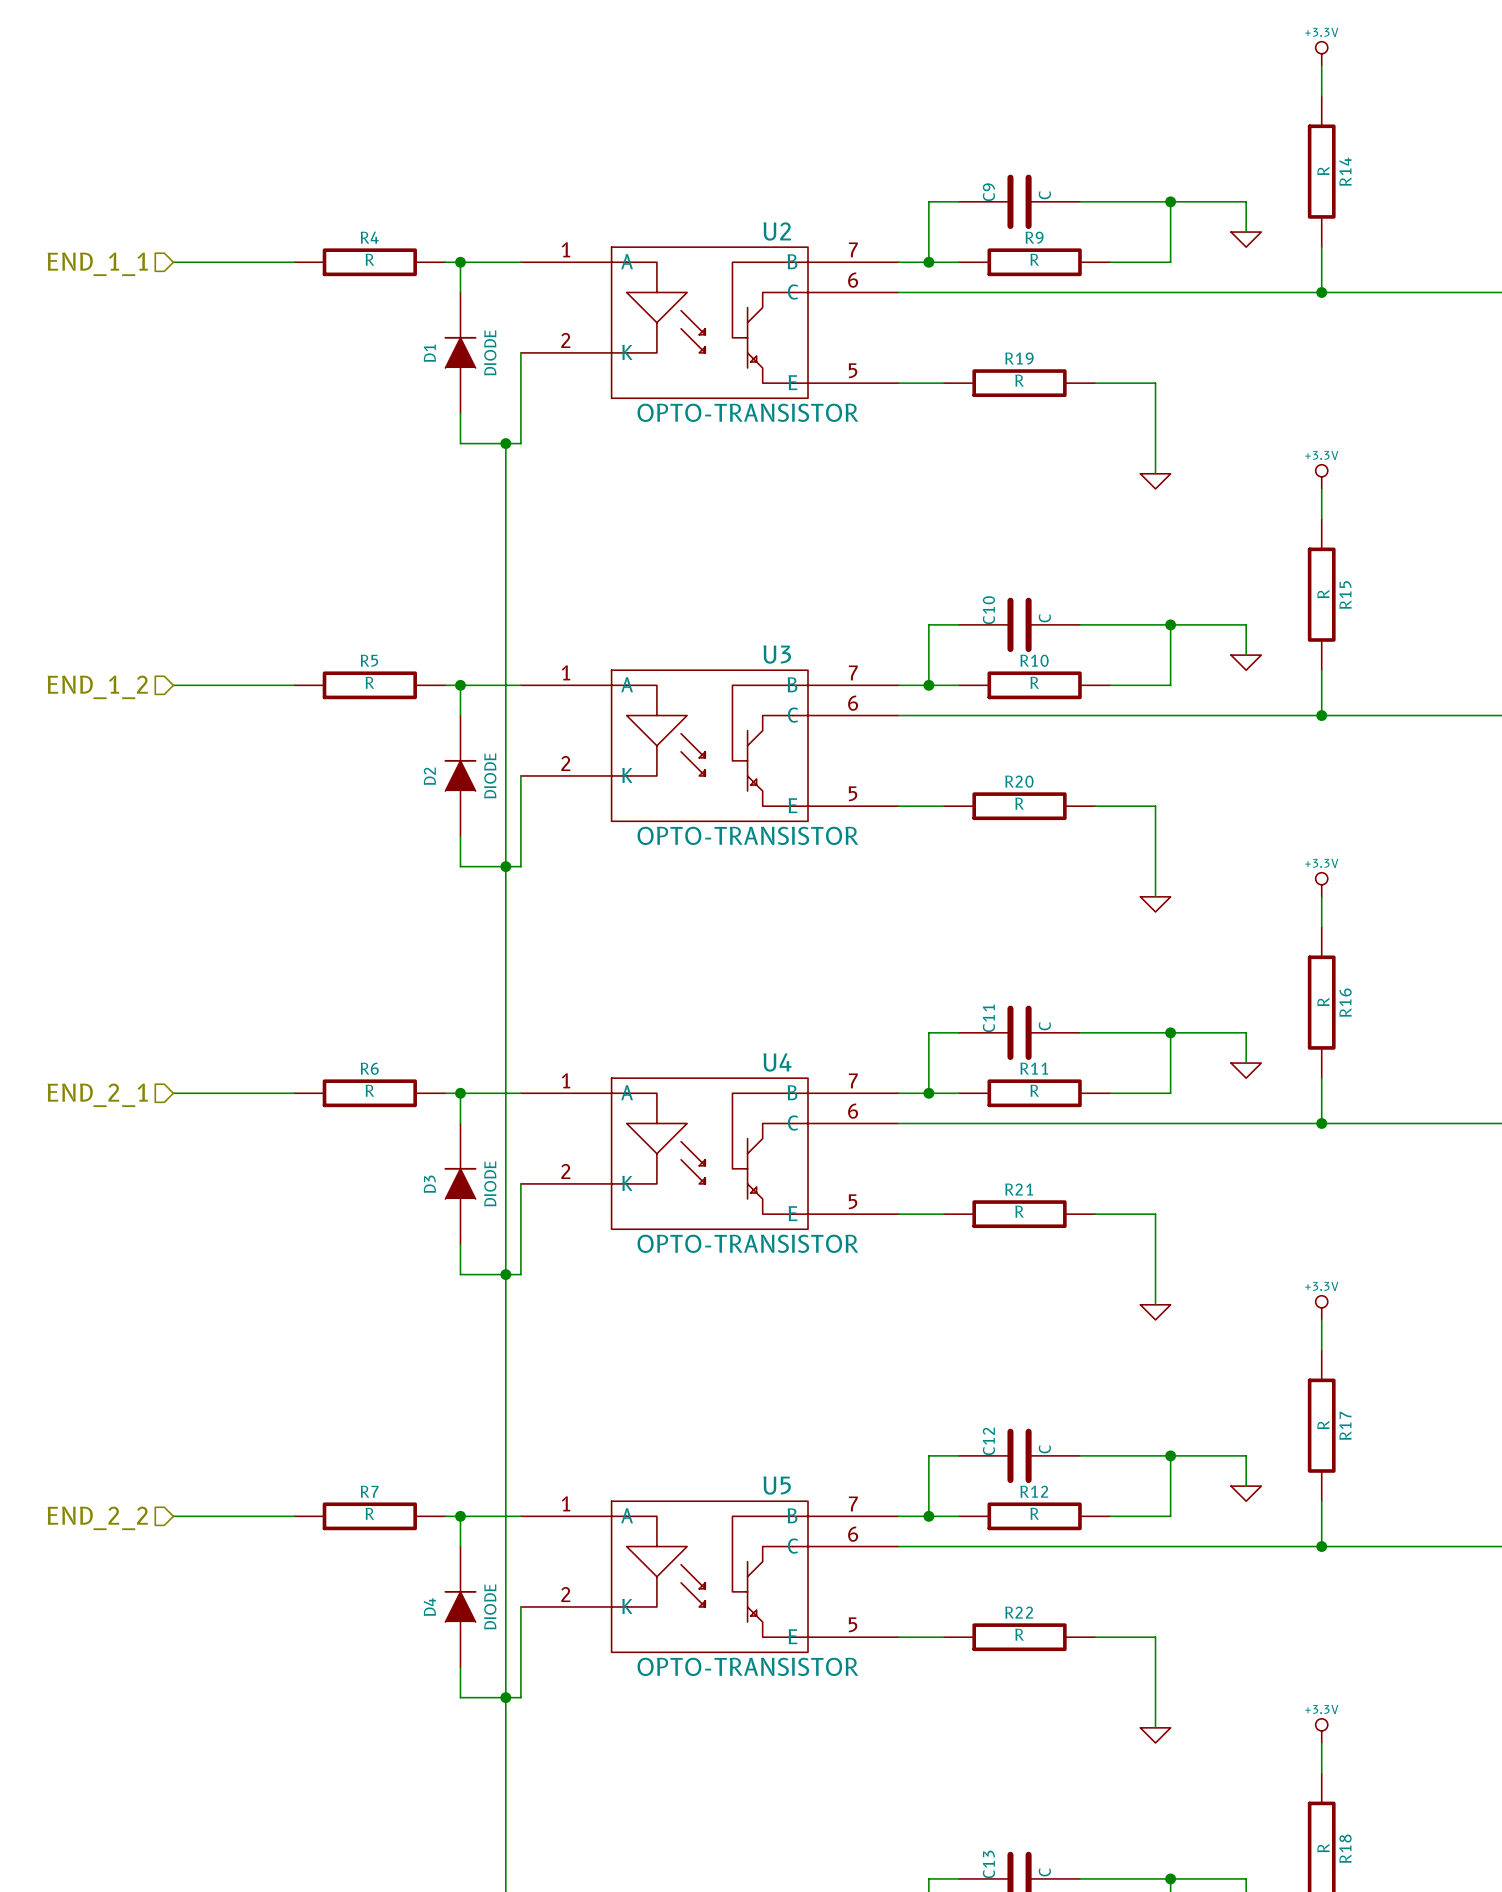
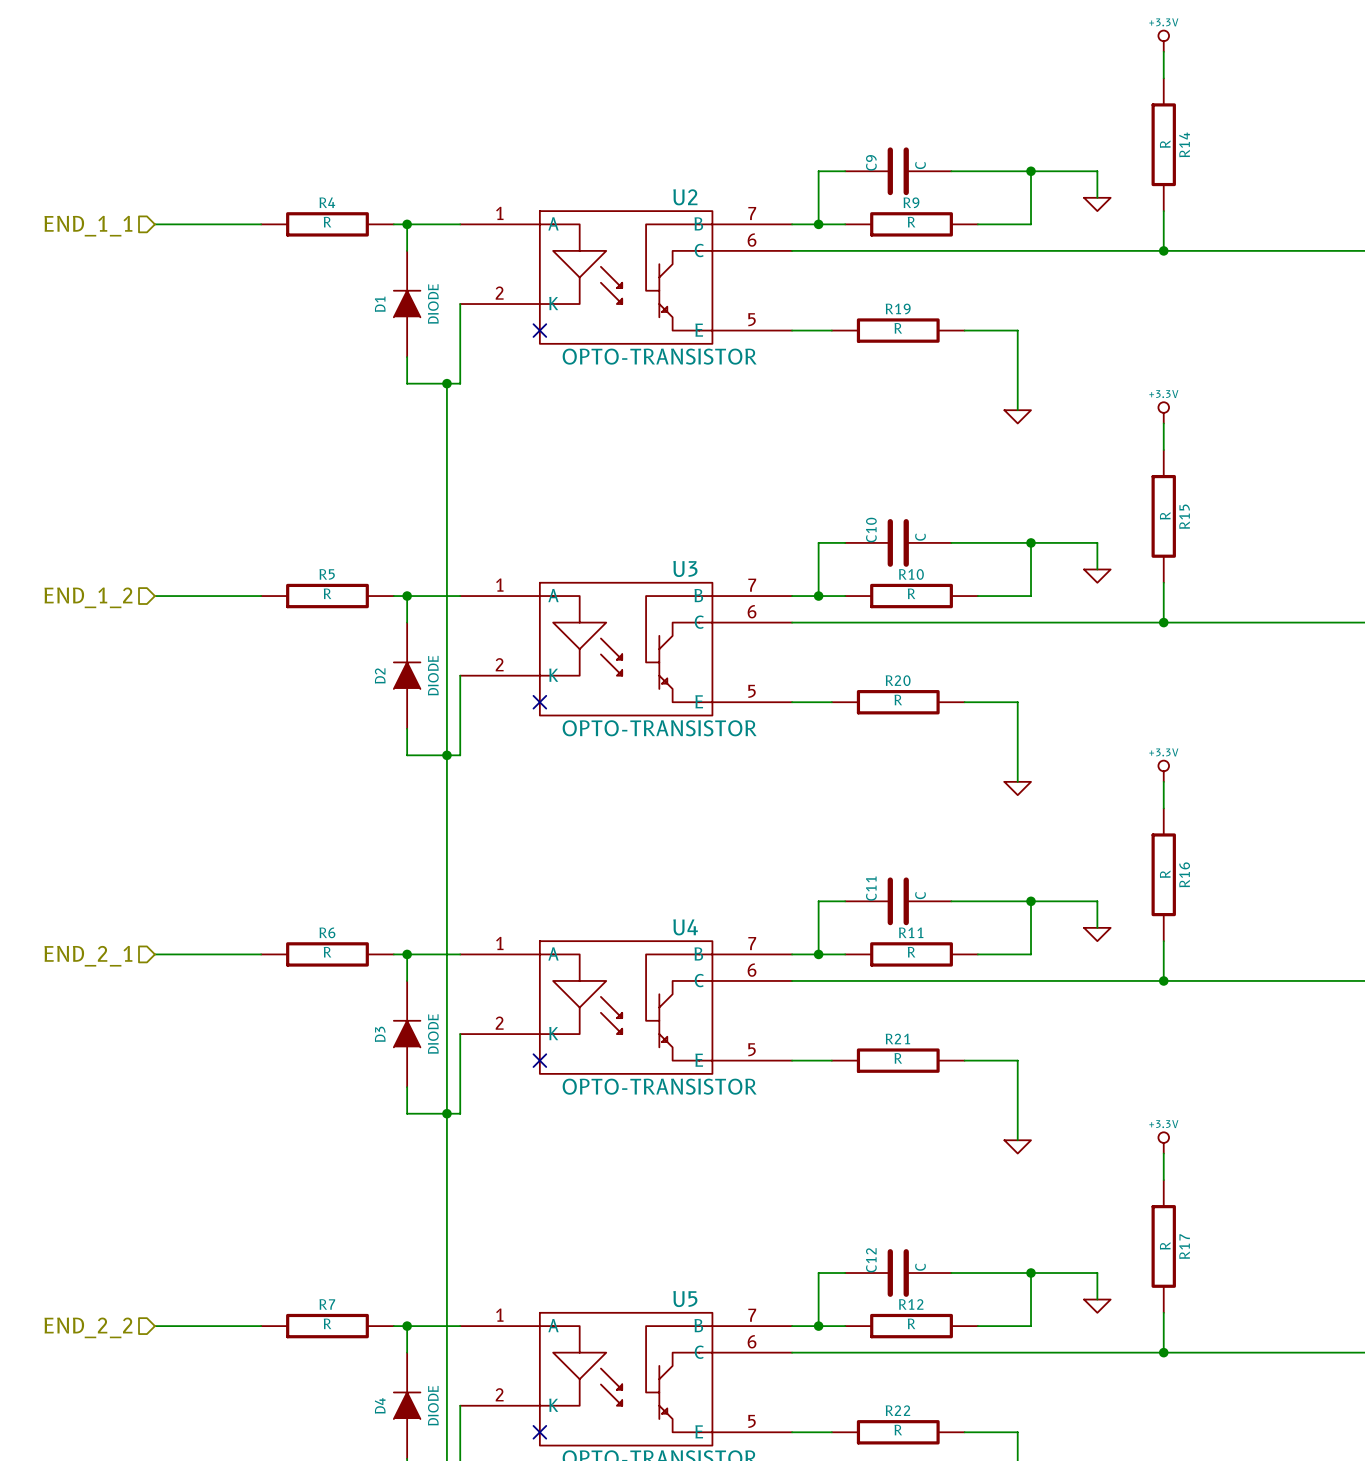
no-connect mark: none -> (539, 330)
no-connect mark: none -> (539, 702)
no-connect mark: none -> (539, 1060)
no-connect mark: none -> (539, 1432)

